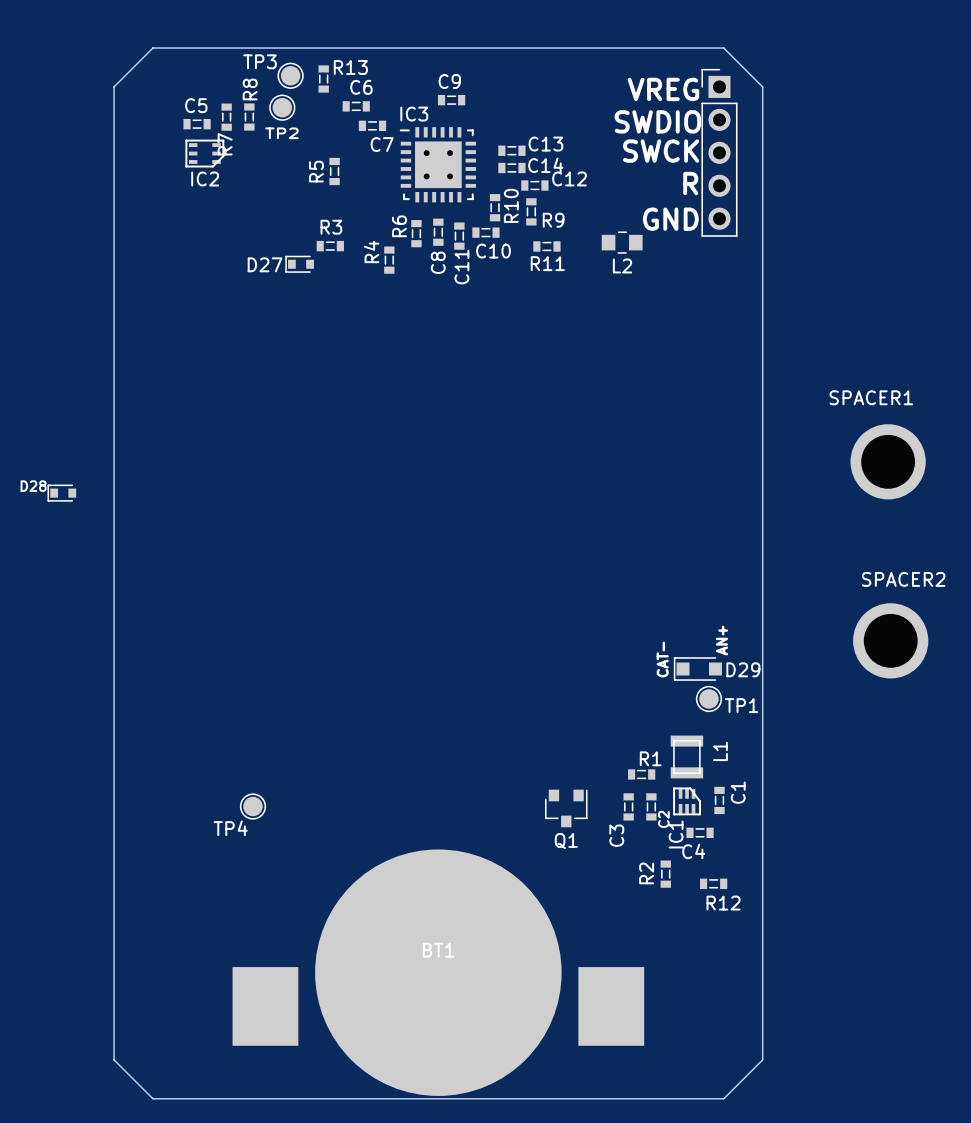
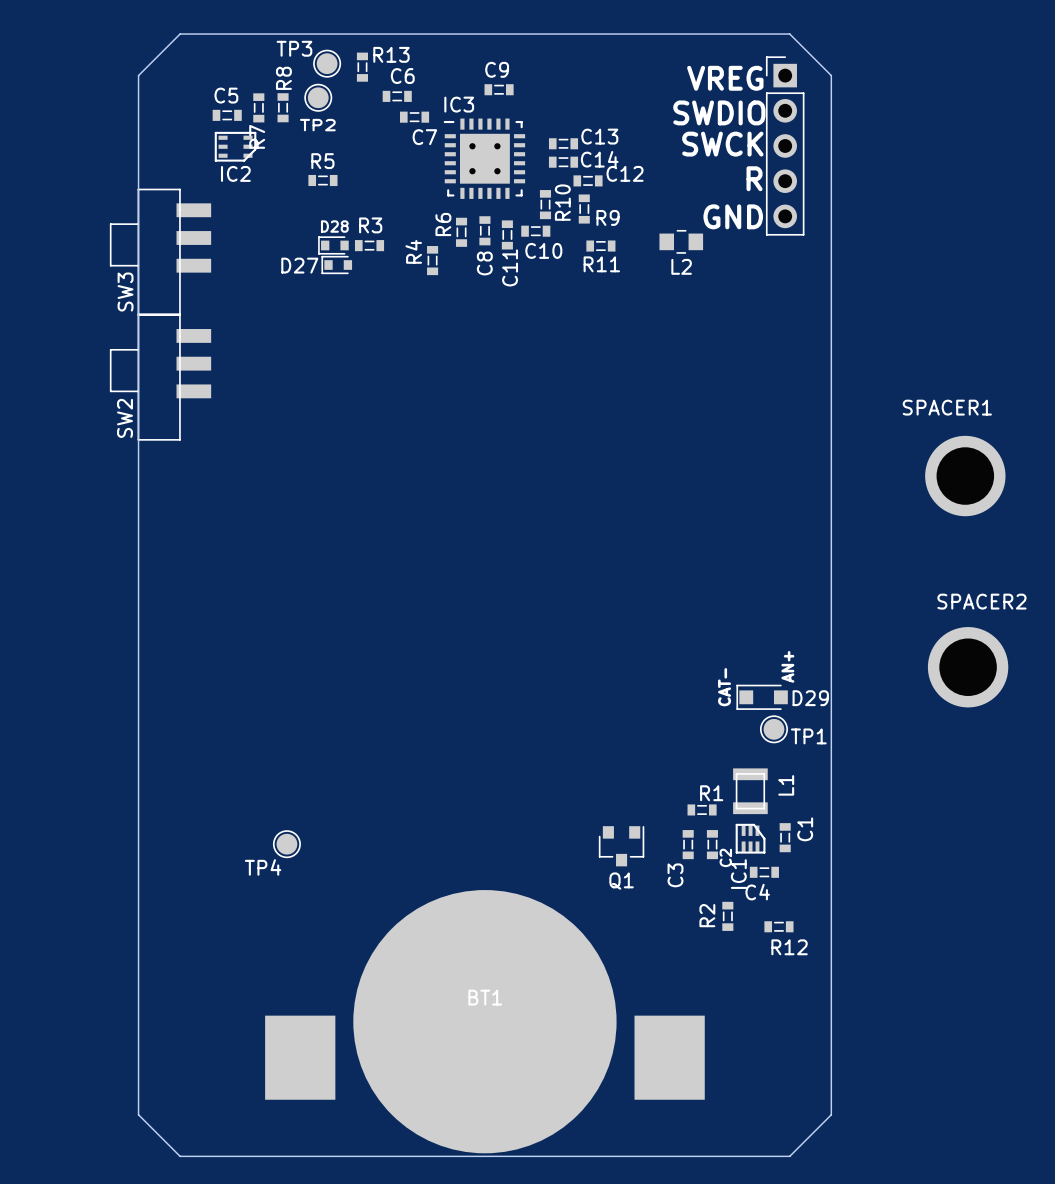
R5 rotation: 0° (334, 171) -> 90° clockwise (322, 180)
R5 position: (334, 171) -> (322, 180)
SW3: none -> (160, 251)
SW2: none -> (160, 377)
D28 name position: D28 (33, 486) -> D28 (334, 226)
D28 position: (61, 493) -> (333, 245)

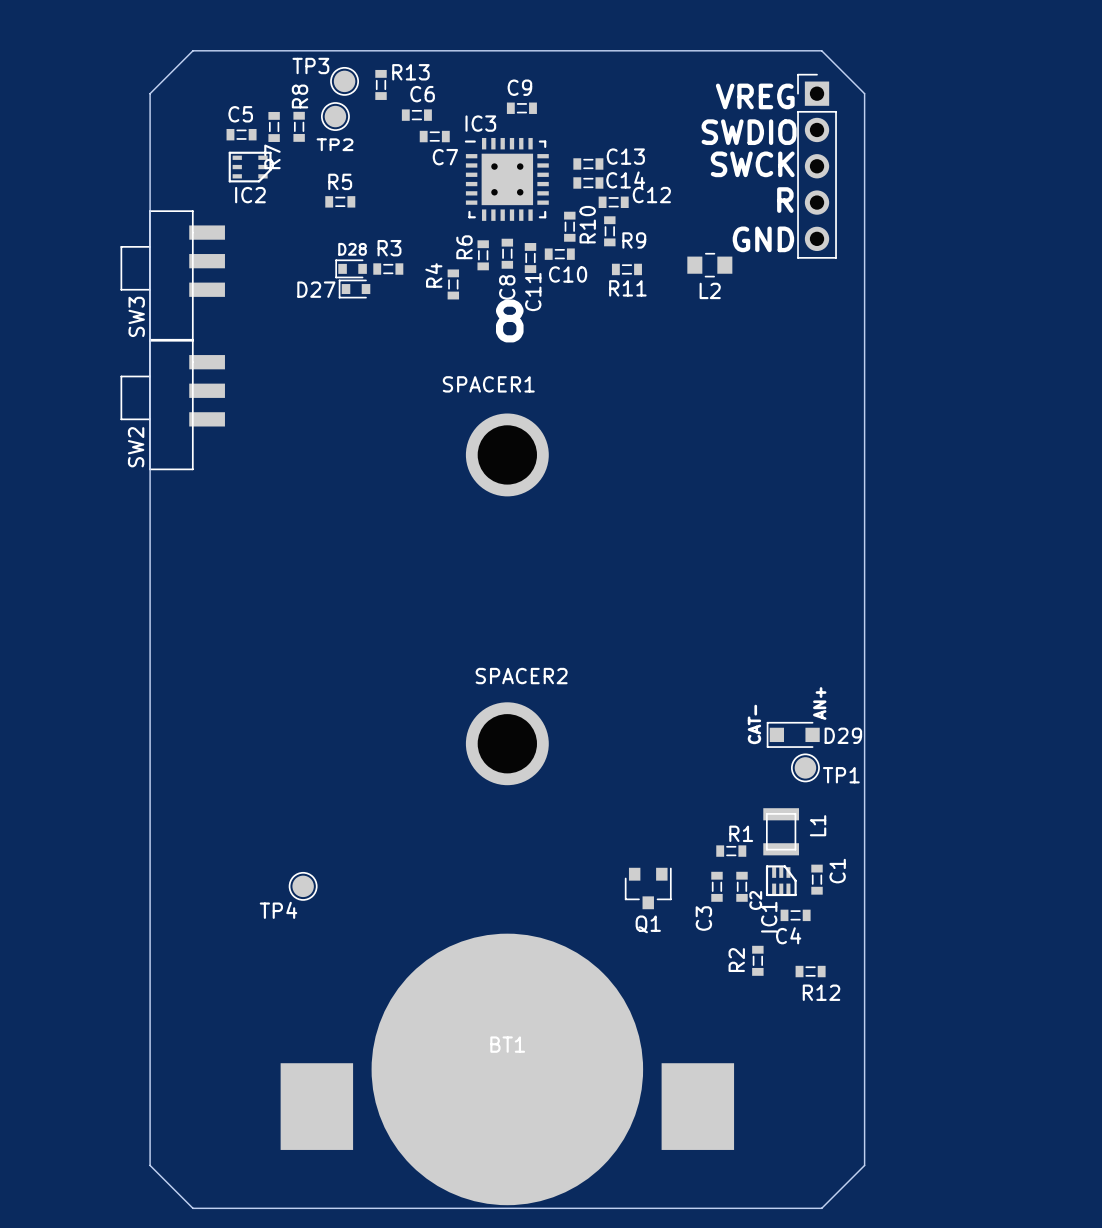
text: none -> 8 (509, 320)
SPACER1 position: (965, 476) -> (507, 454)
SPACER2 position: (968, 667) -> (507, 743)

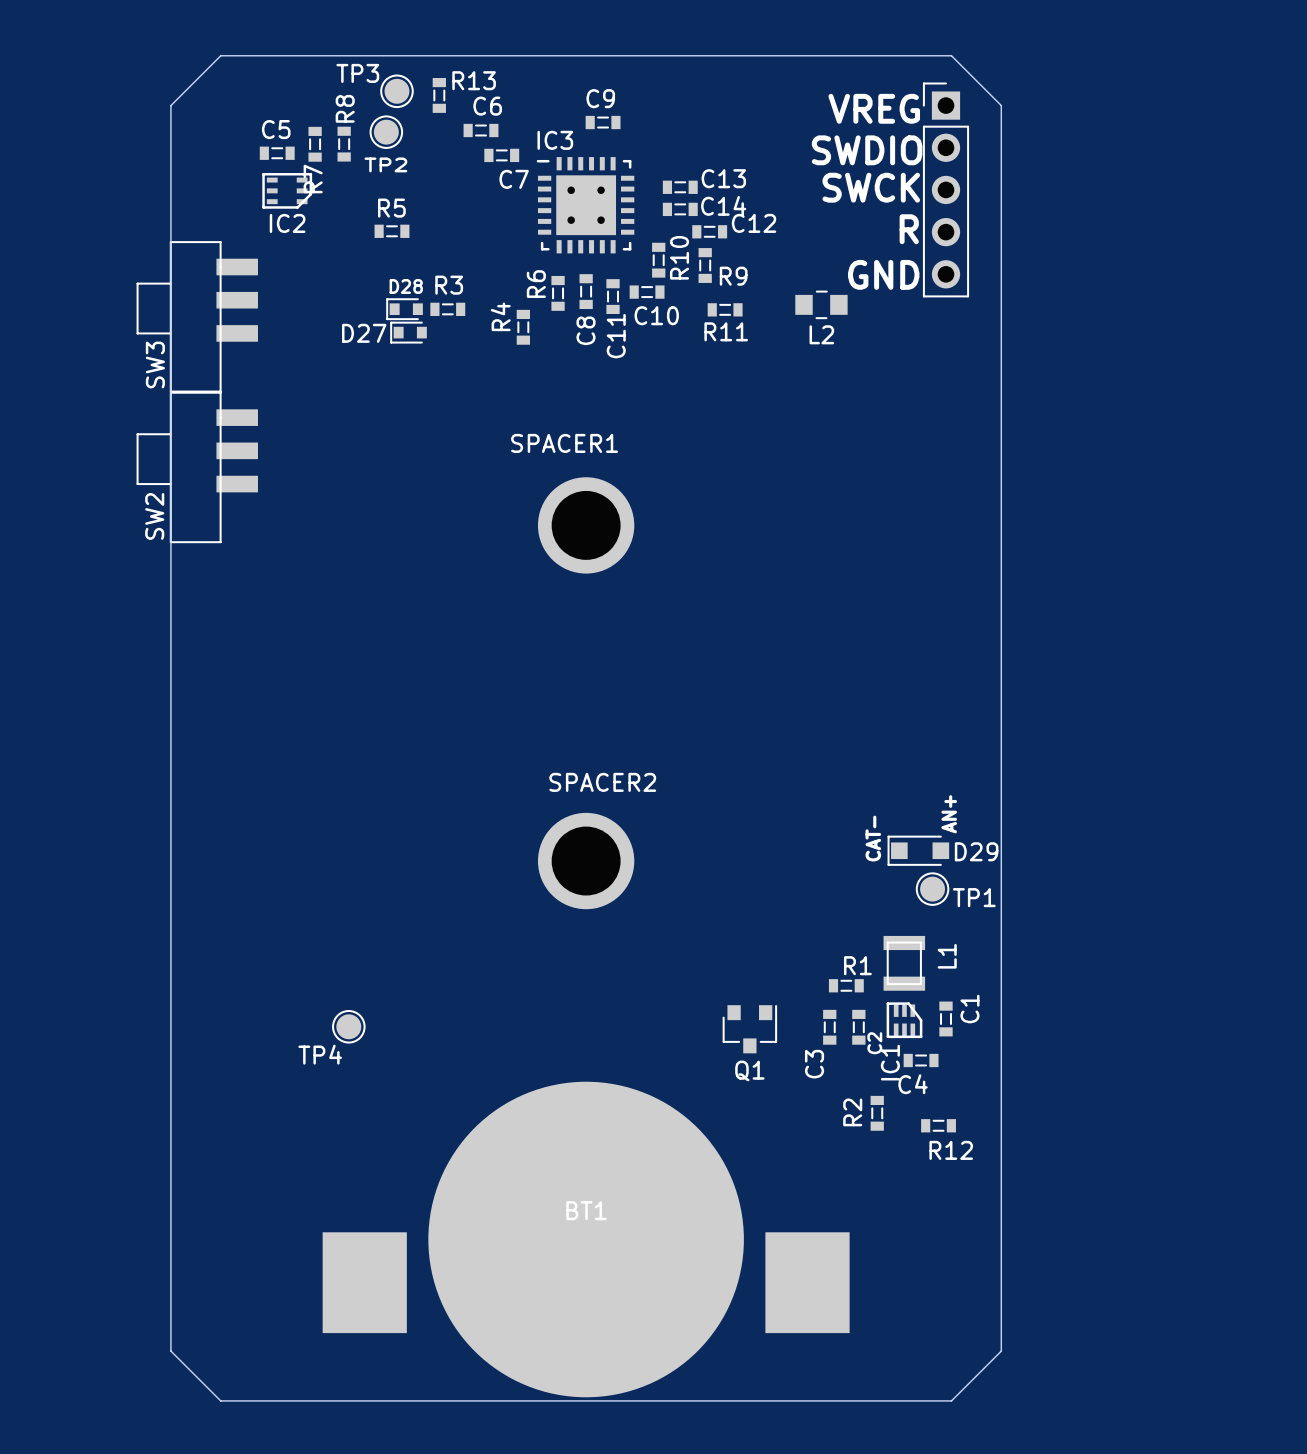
text: 8 (509, 320) -> none

